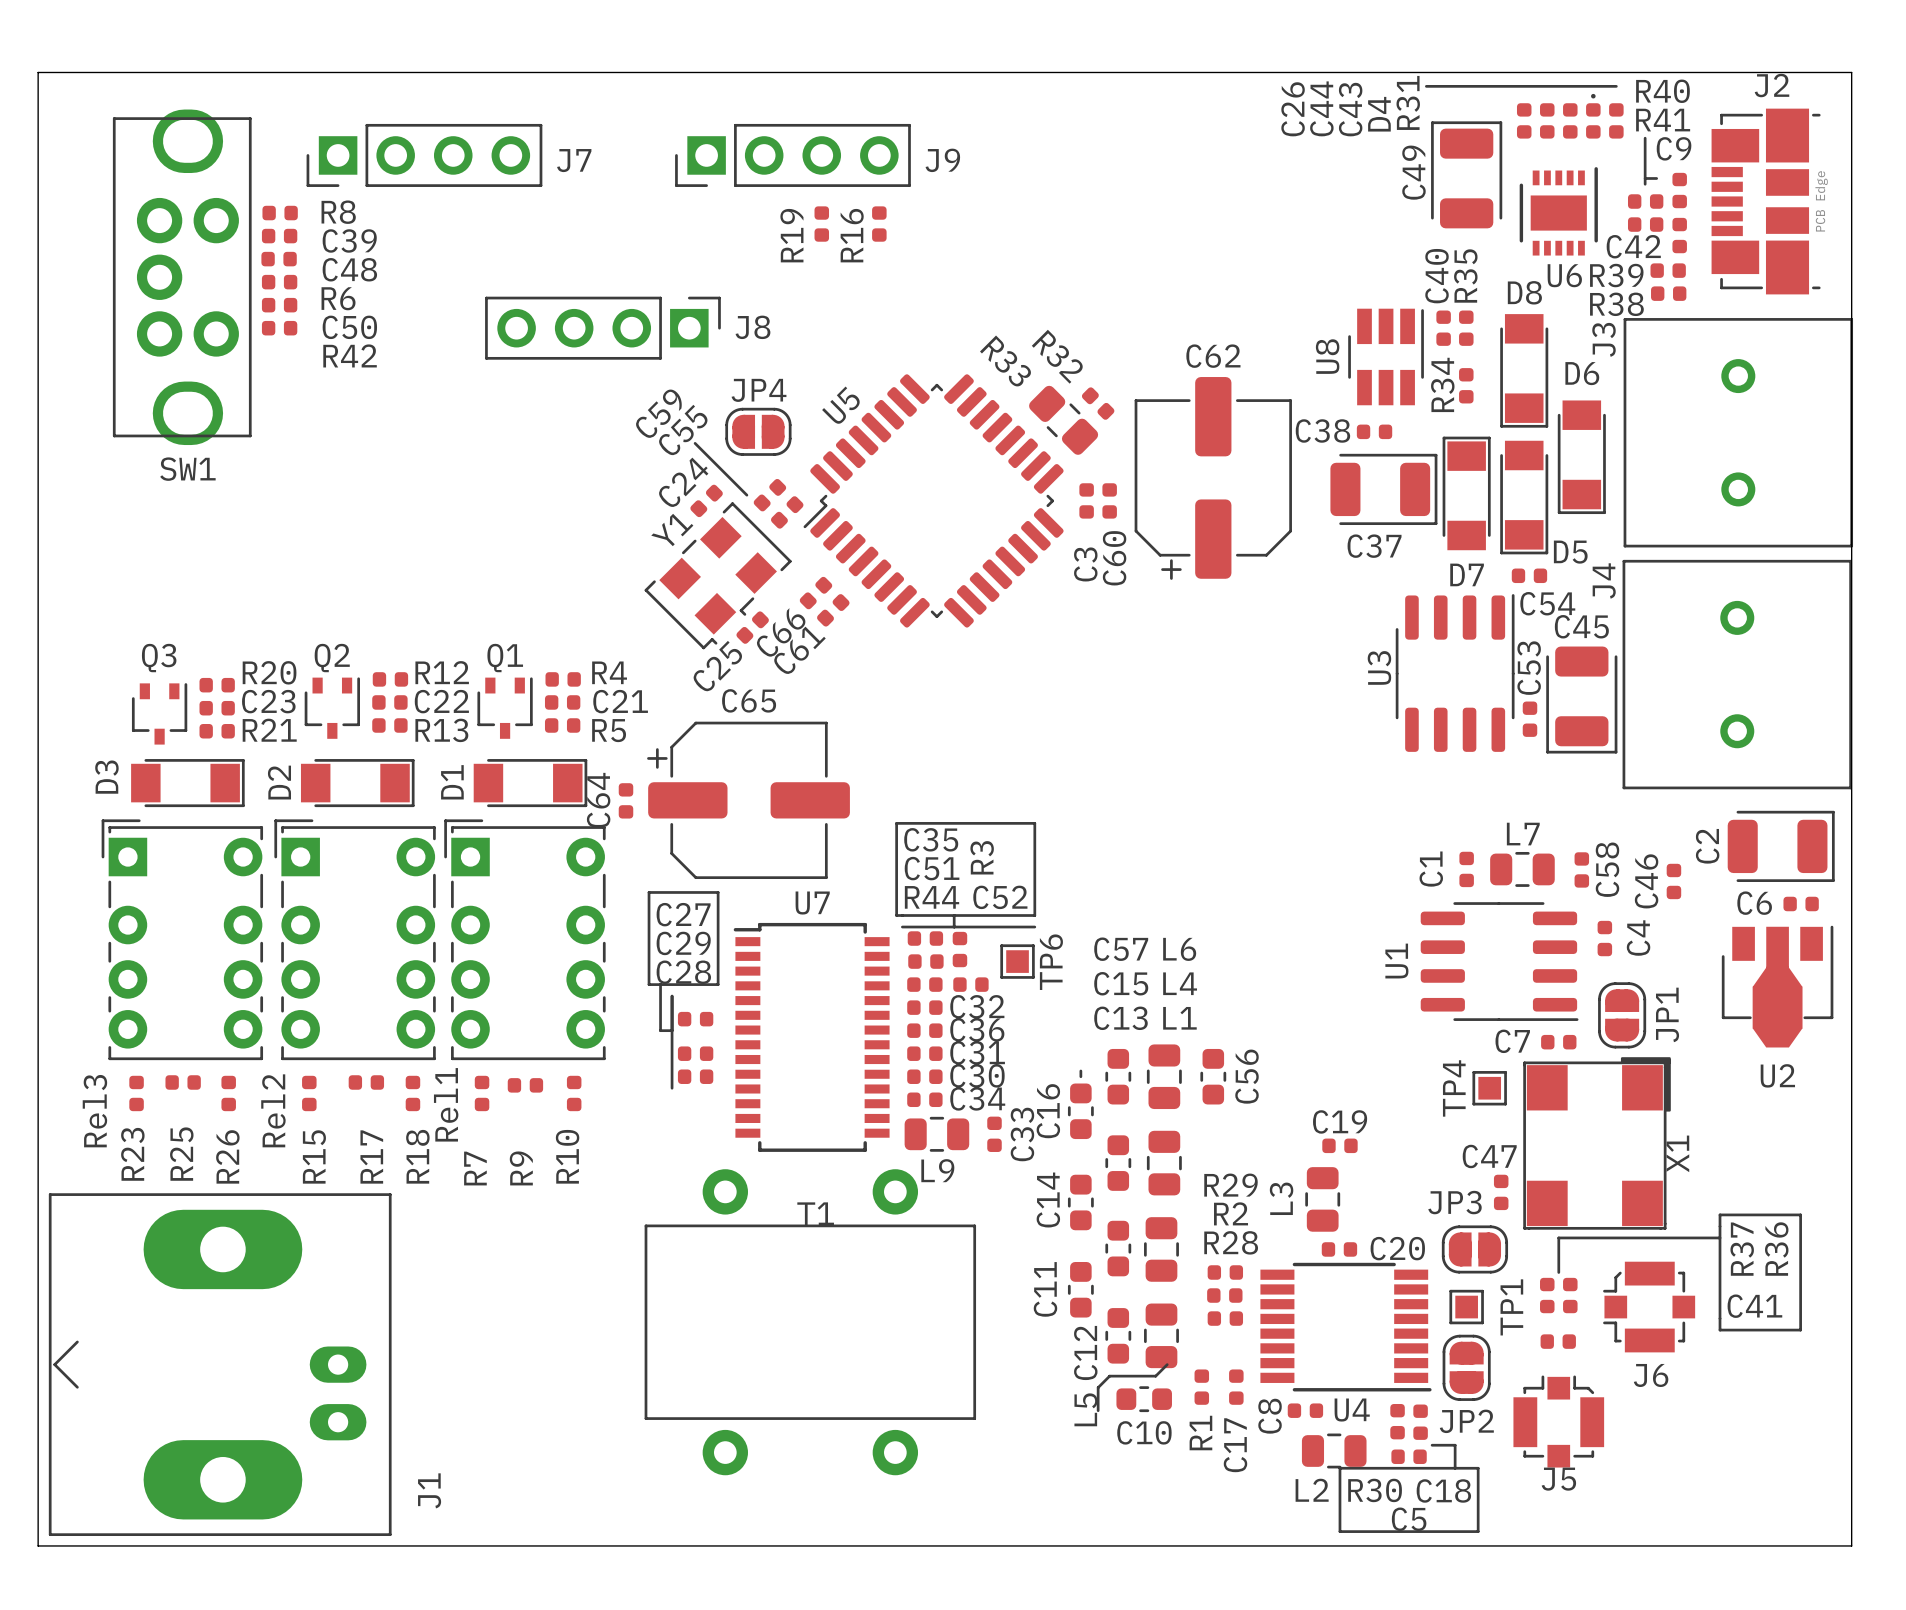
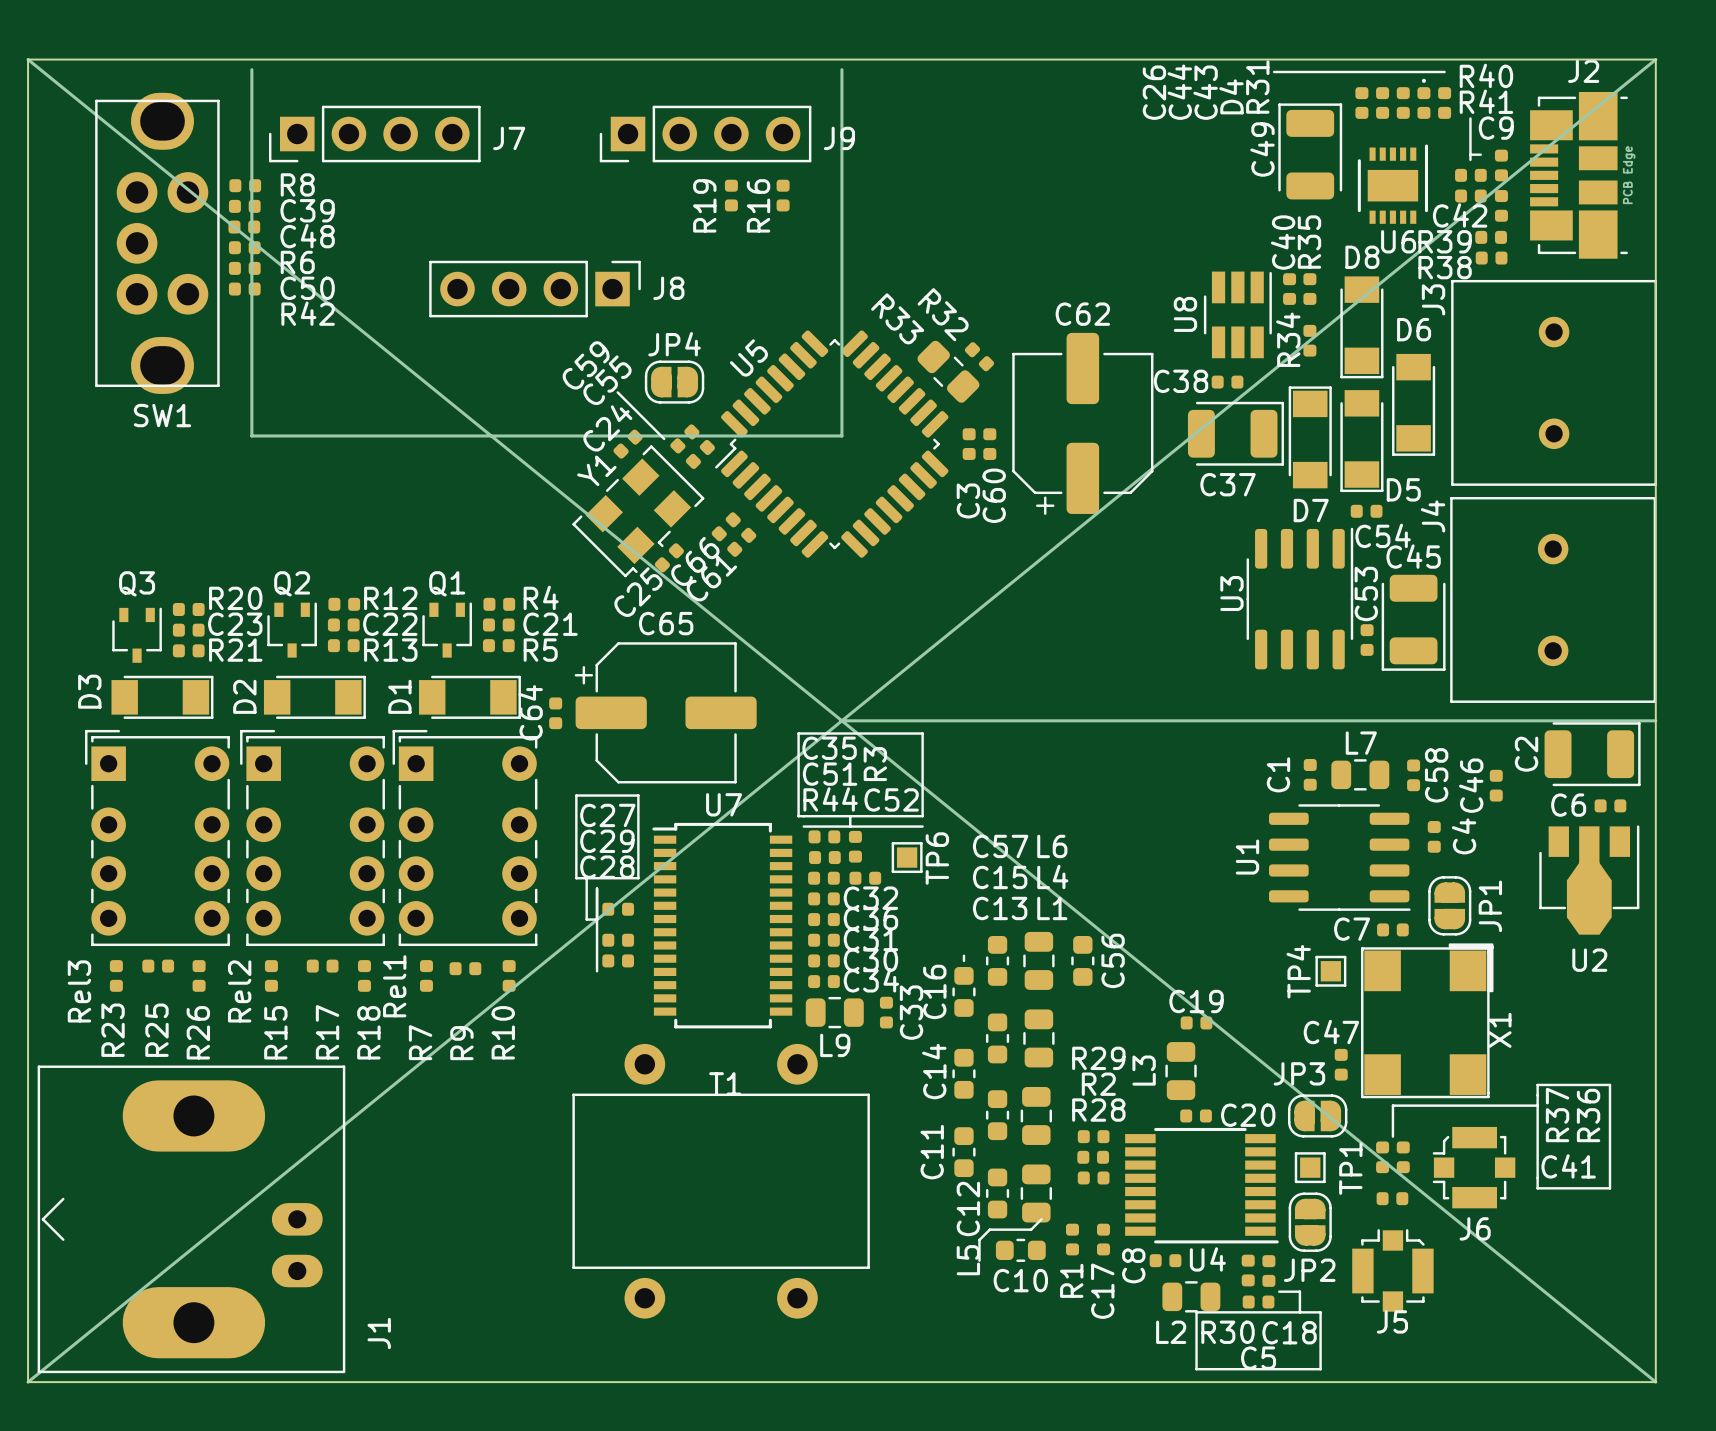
line: none -> (28, 59) (1655, 1382)
line: none -> (1655, 59) (28, 1382)
line: none -> (251, 69) (251, 435) (841, 435) (841, 69)
line: none -> (841, 720) (1655, 720)

